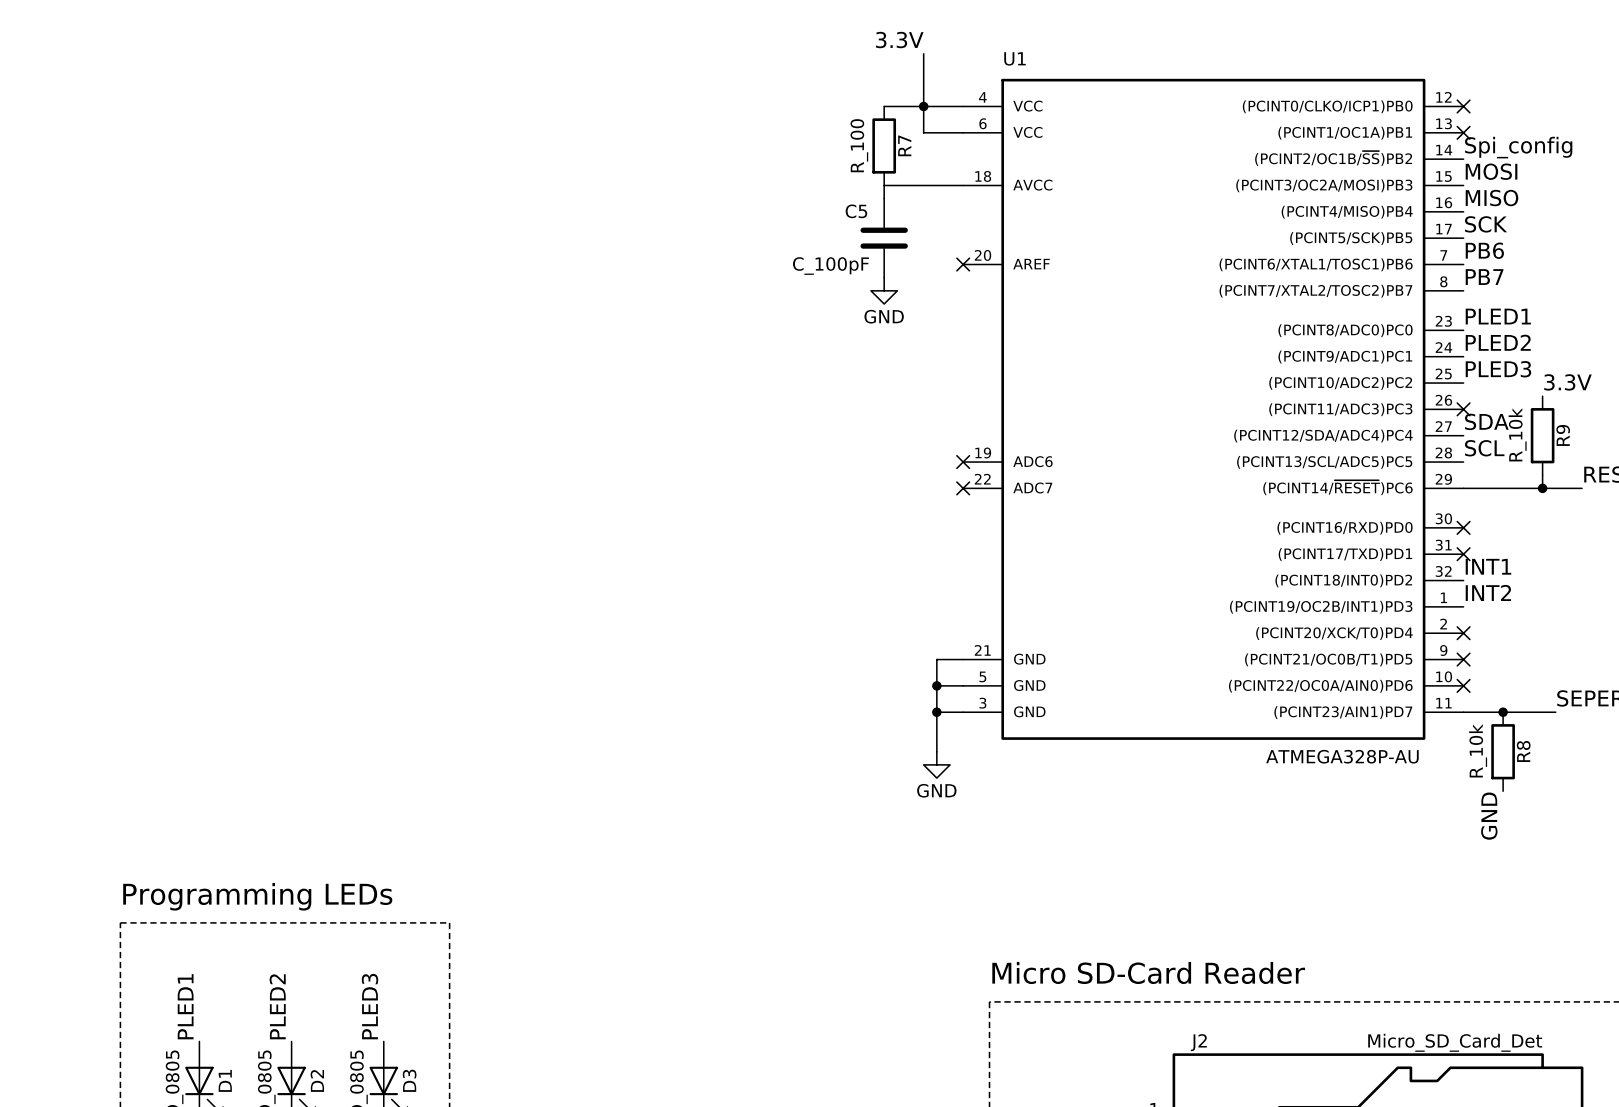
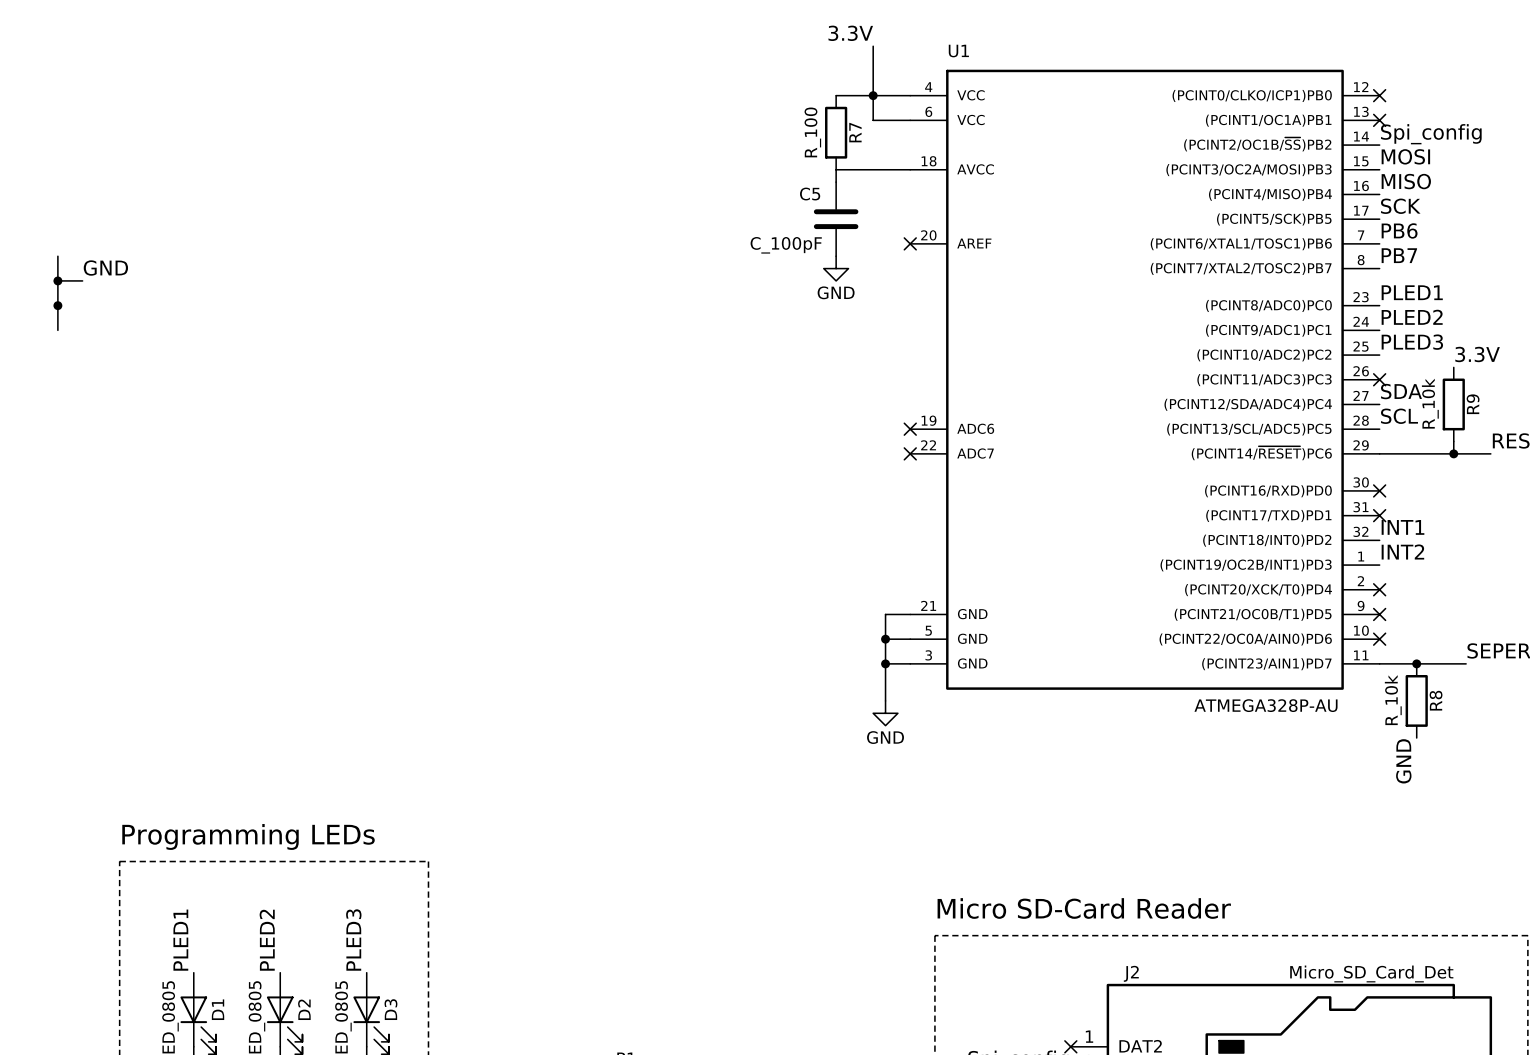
wire: none -> (57, 256) (57, 330)
label: none -> GND (105, 268)
wire: none -> (57, 280) (82, 280)
junction: none -> (57, 280)
junction: none -> (57, 305)

